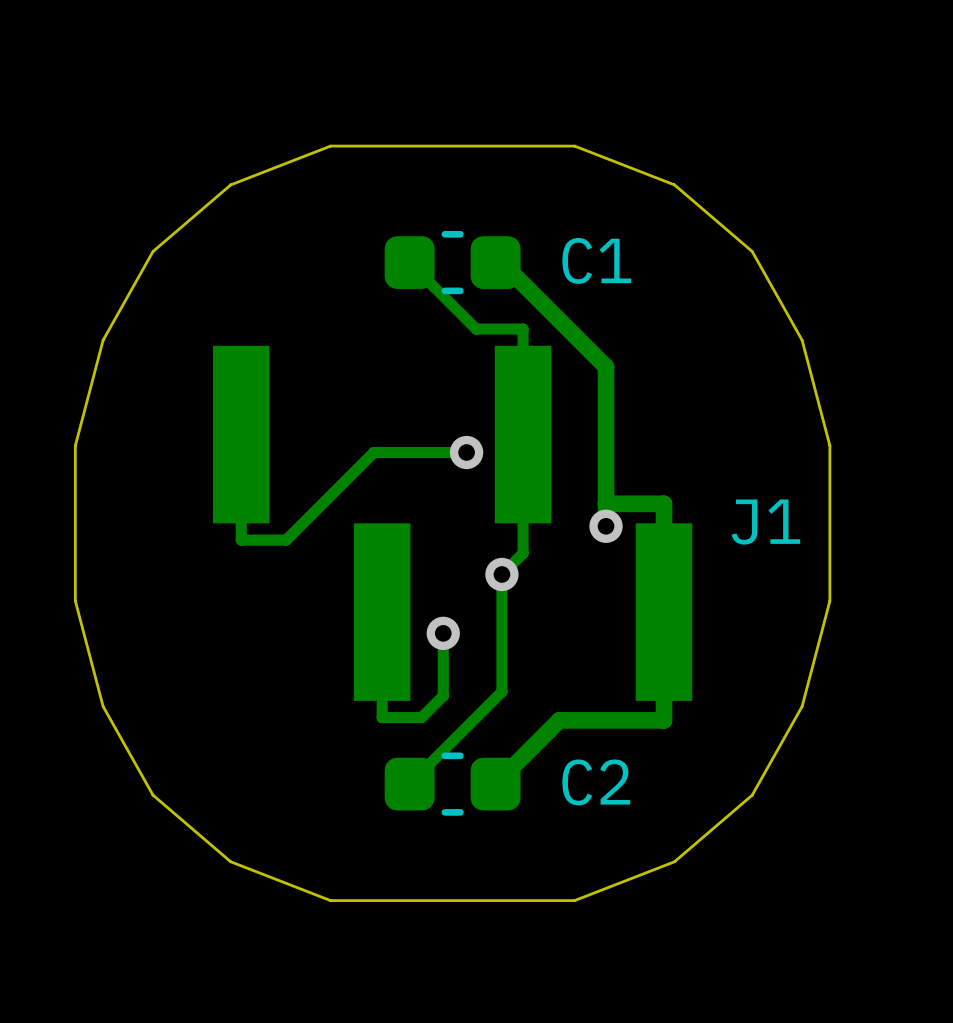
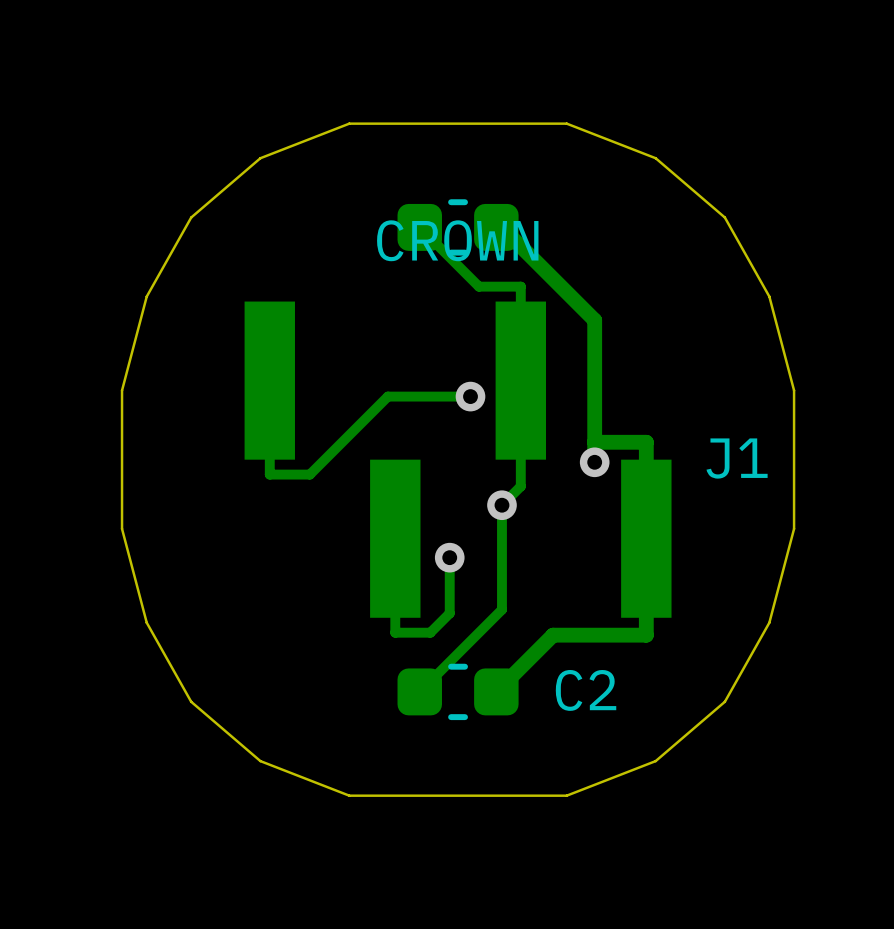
C1 name: C1 (596, 260) -> none
text: none -> CROWN (457, 240)

